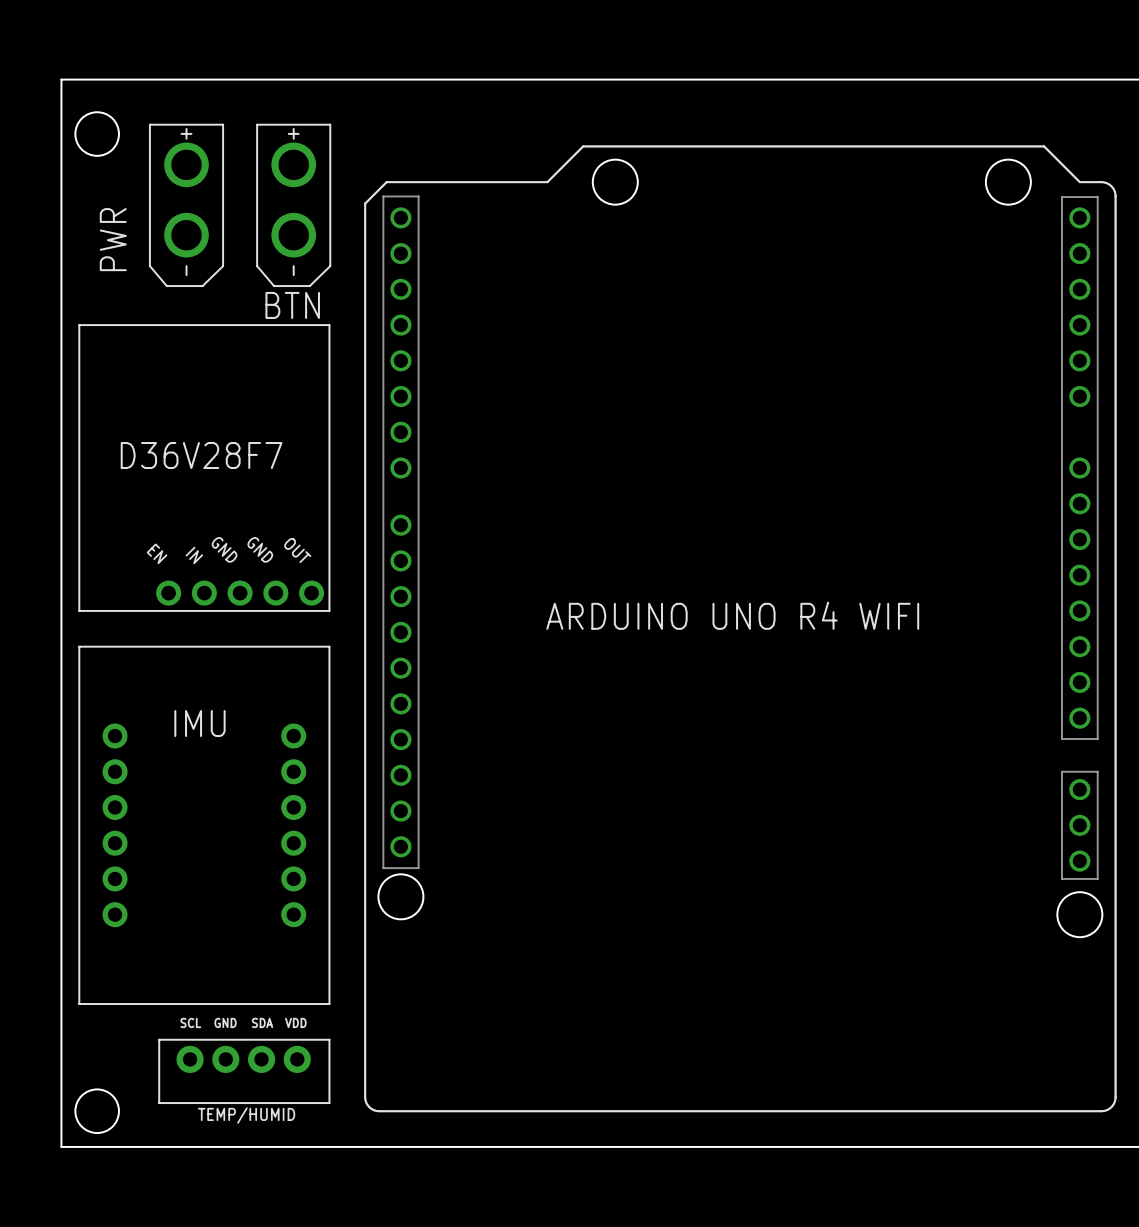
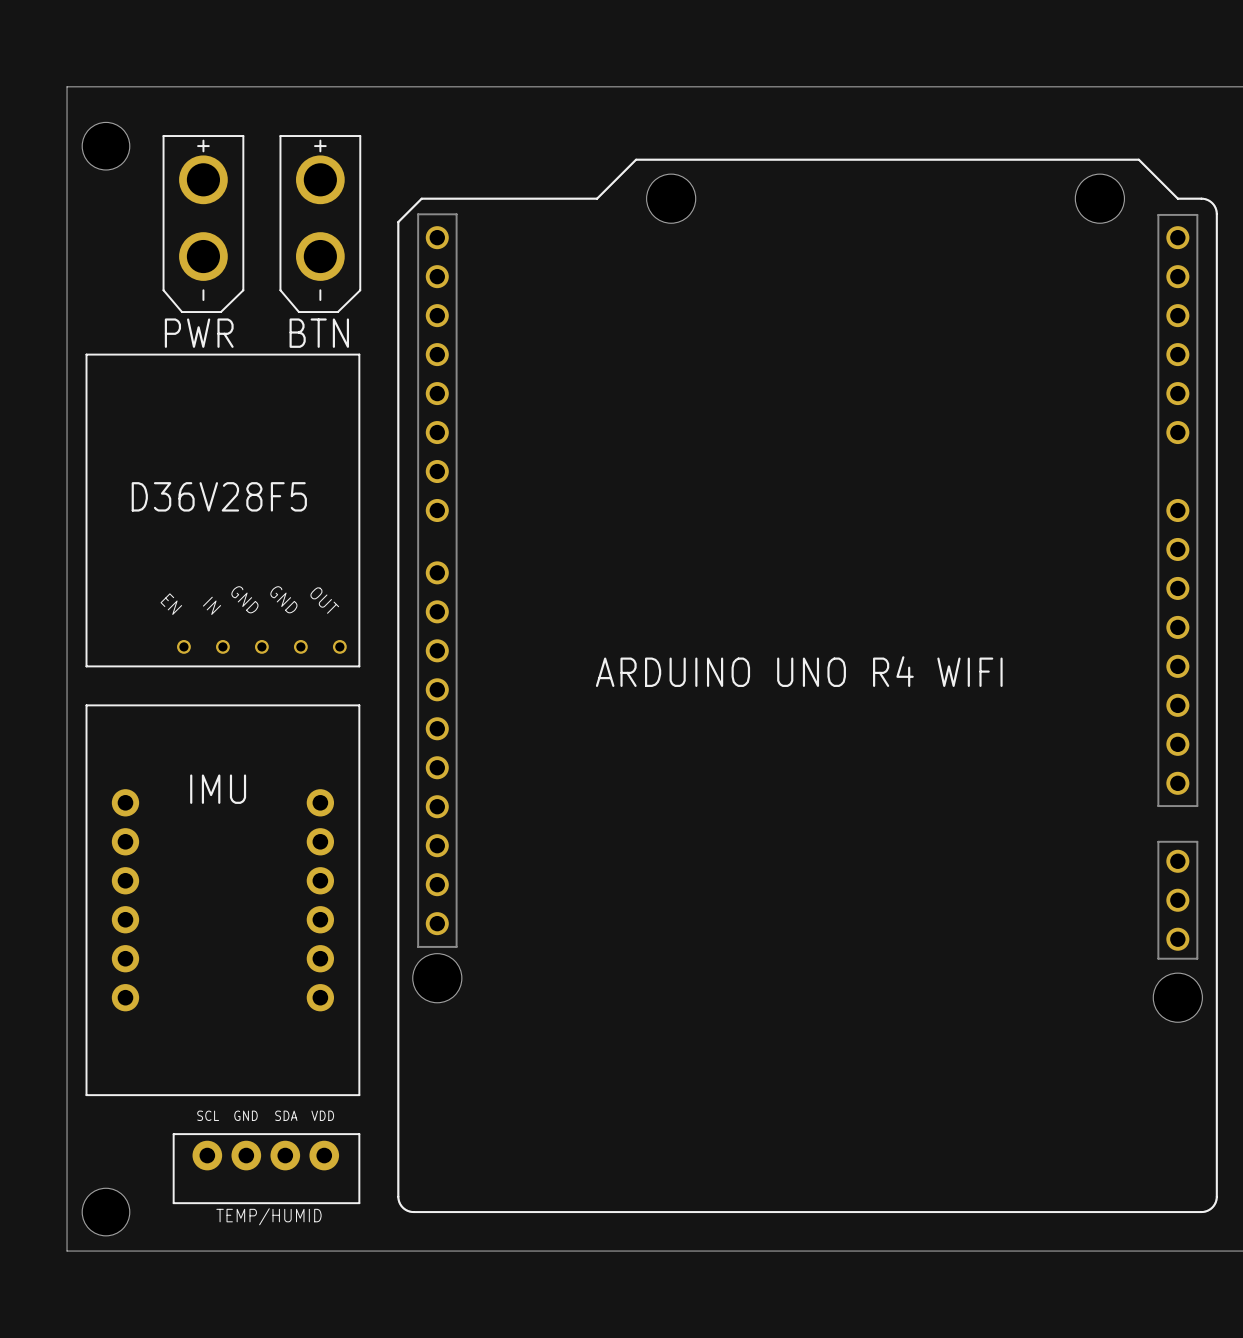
text rotation: 0° (113, 239) -> 90° clockwise (199, 333)
text position: PWR (113, 239) -> PWR (199, 333)
part footprint: [78, 324, 331, 612] -> [85, 353, 361, 668]
text: D36V28F7 (201, 455) -> D36V28F5 (219, 496)

